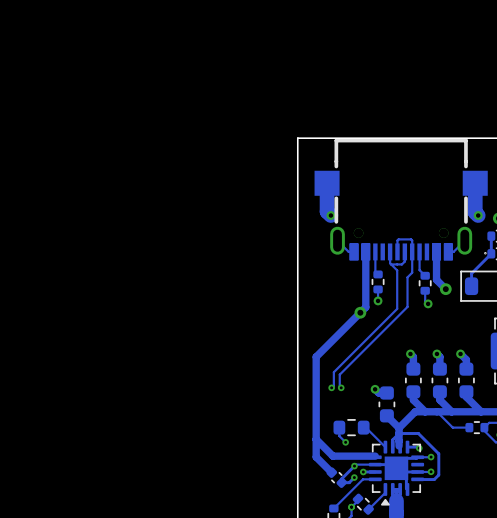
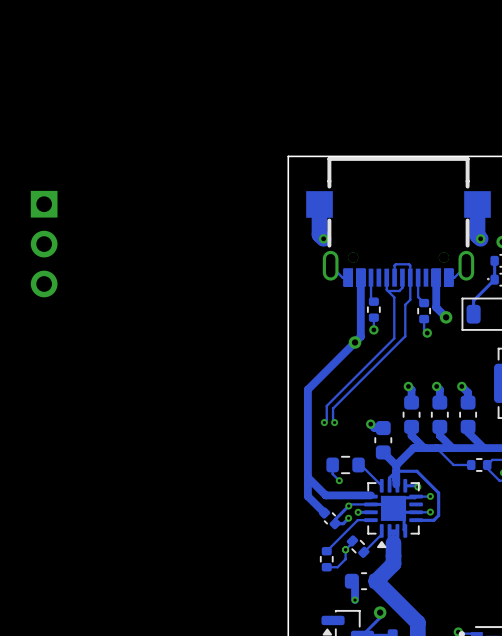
part: none -> (44, 244)

